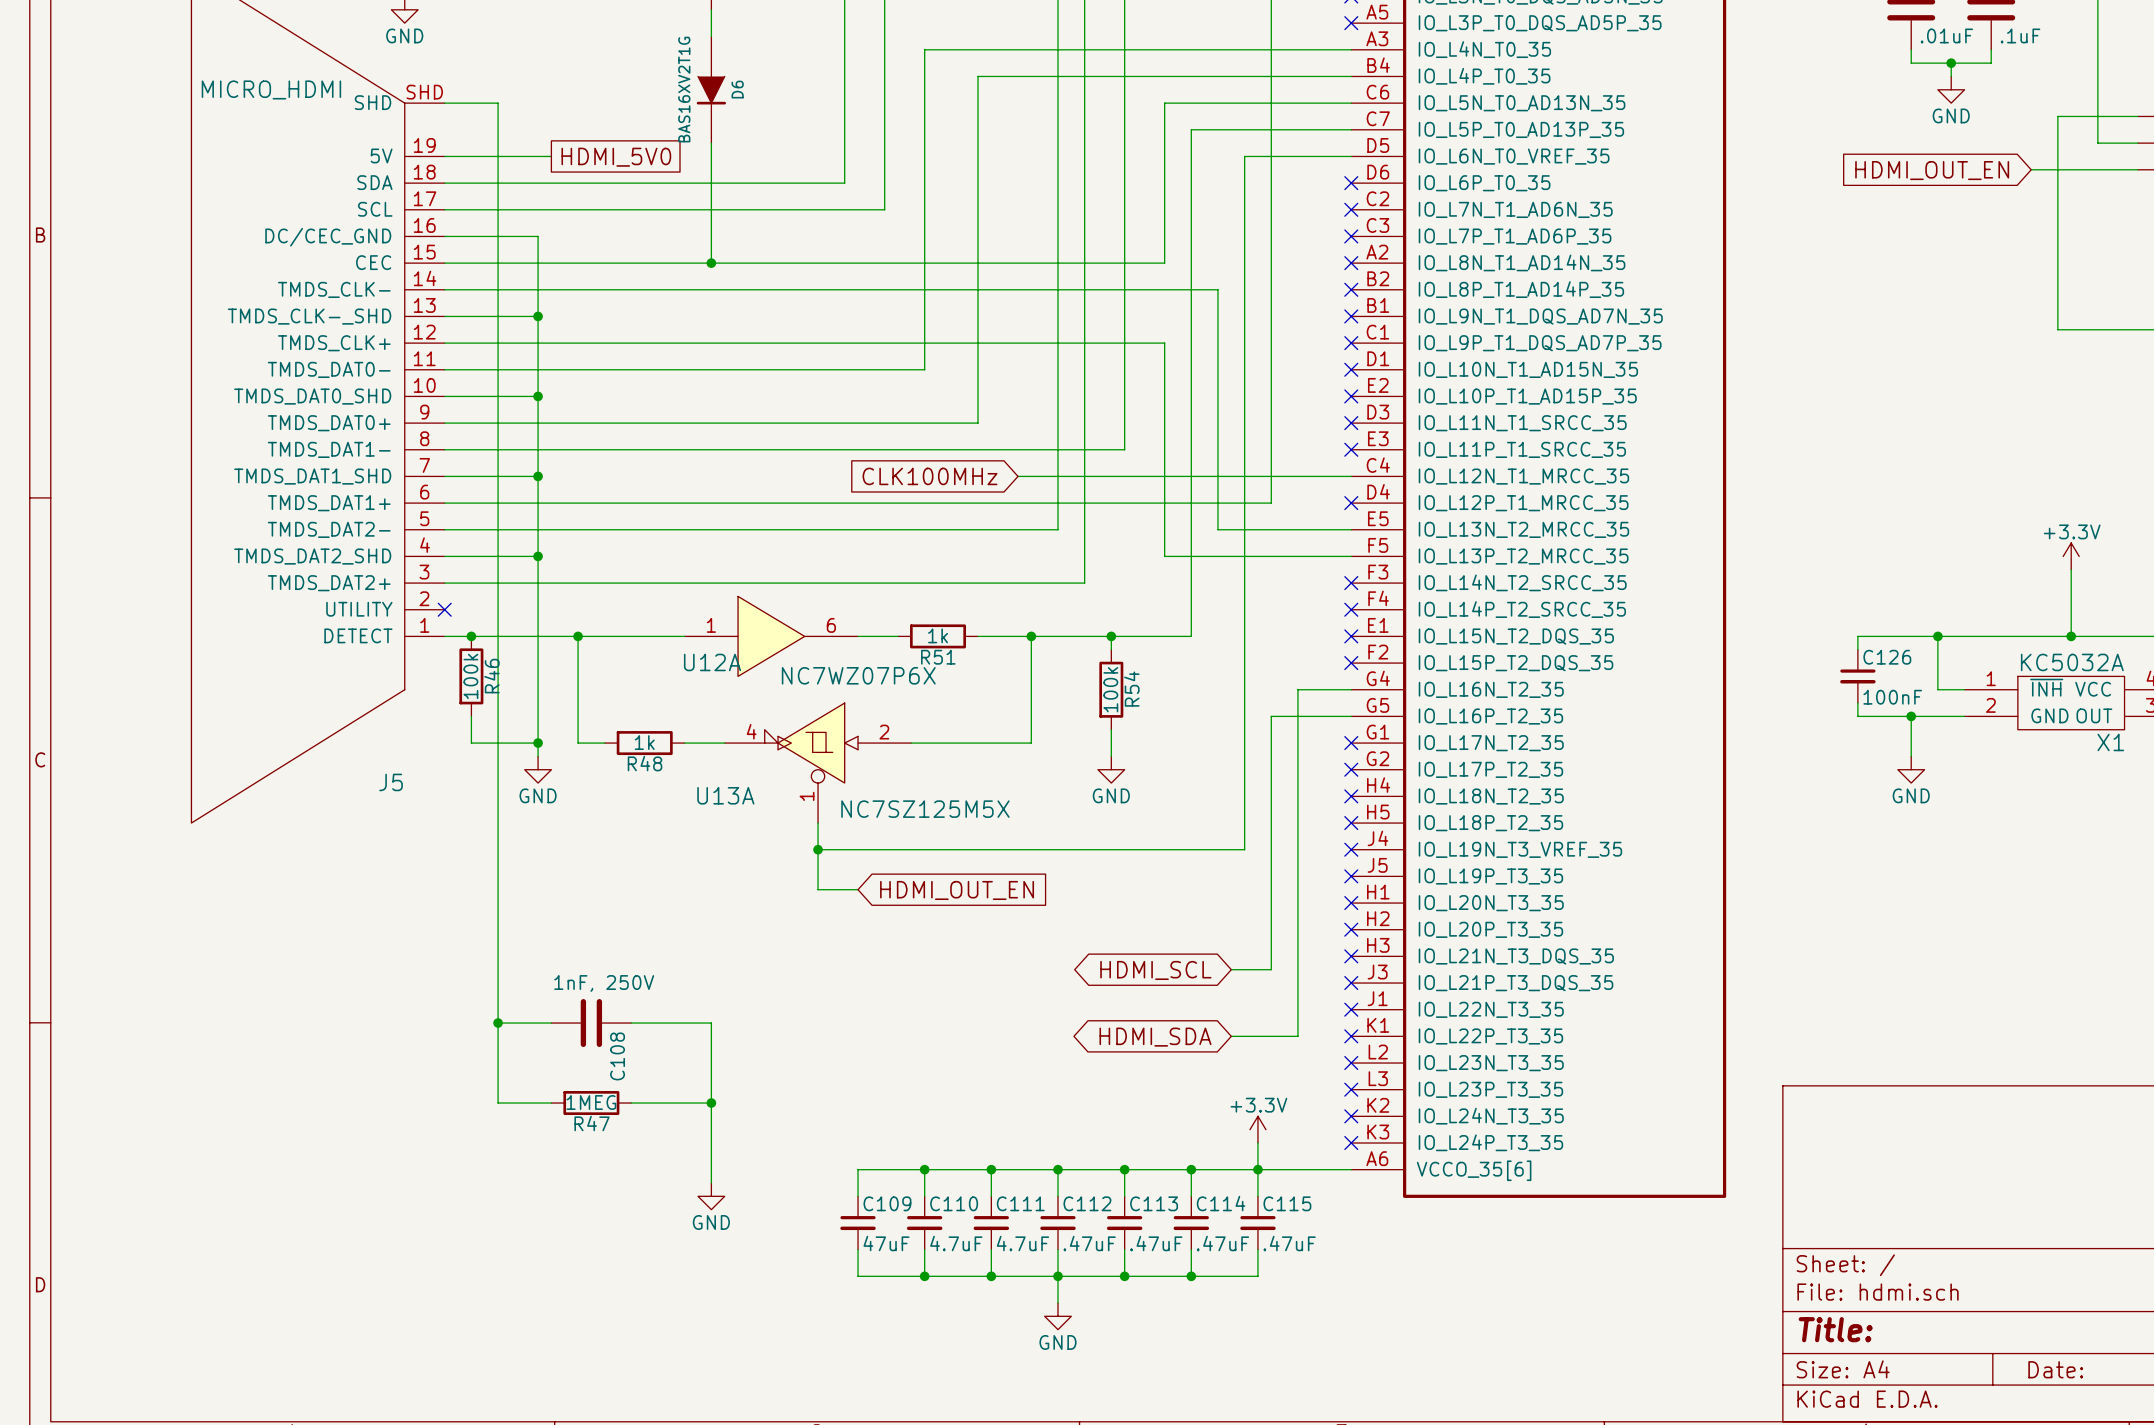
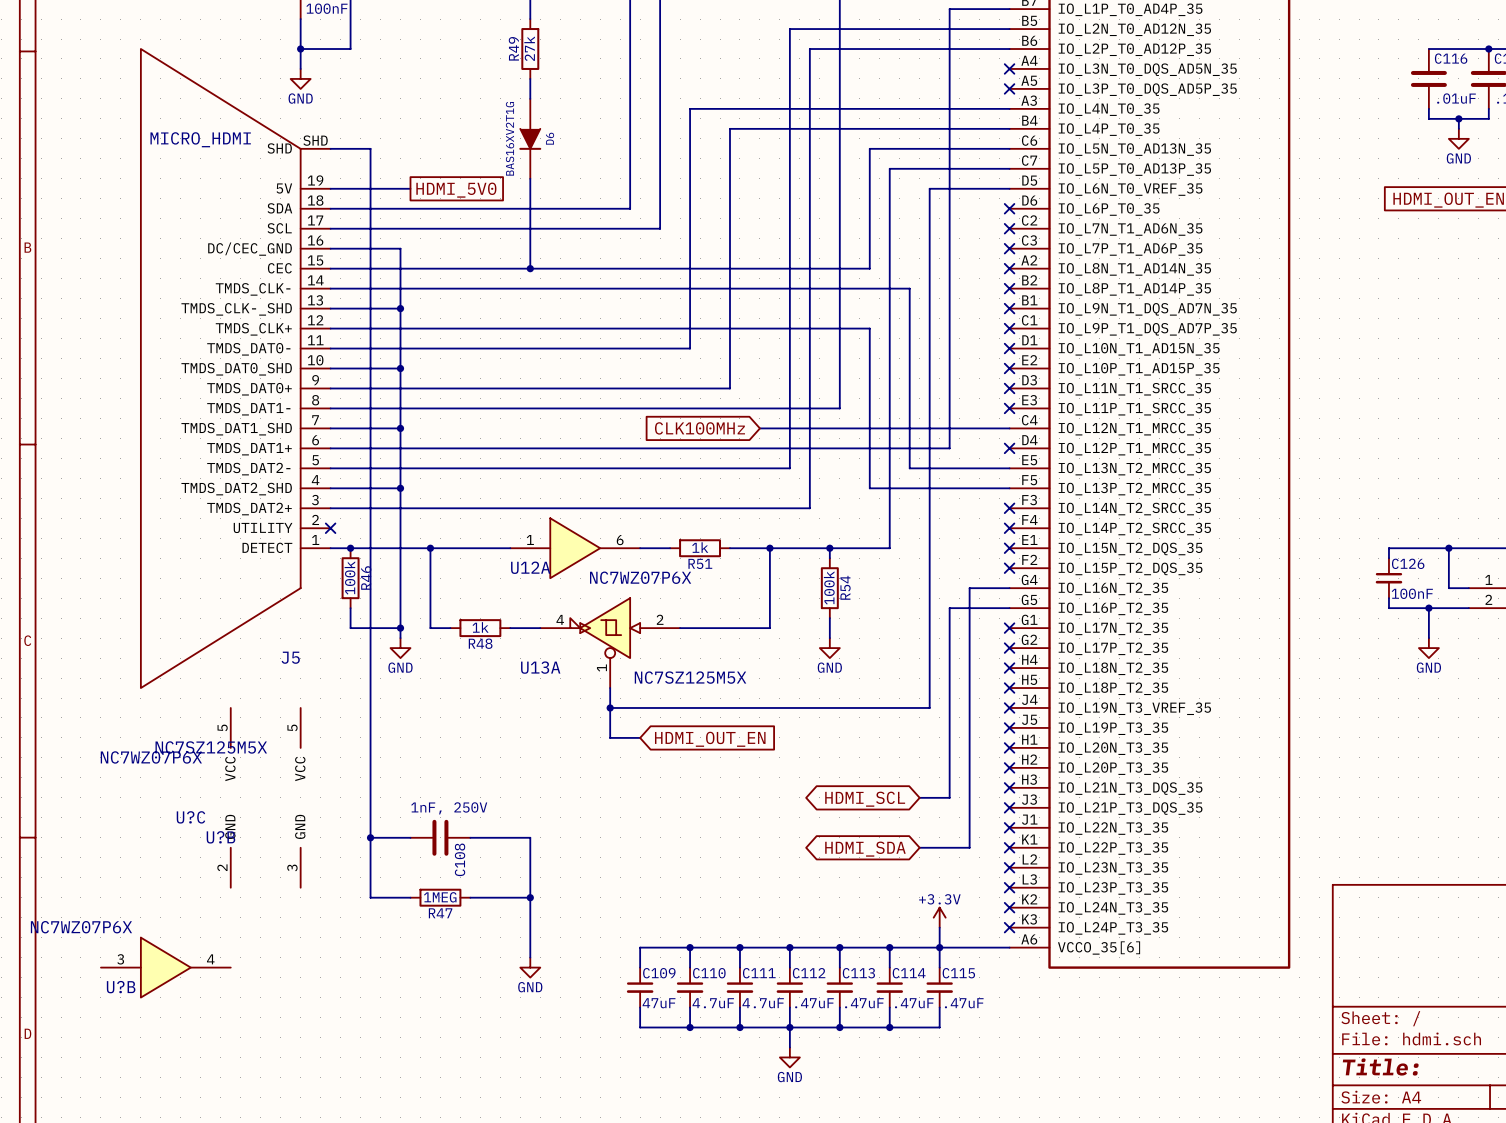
U?C: none -> NC7WZ07P6X (230, 797)
U?B: none -> NC7SZ125M5X (300, 797)
U?B: none -> NC7WZ07P6X (165, 967)

